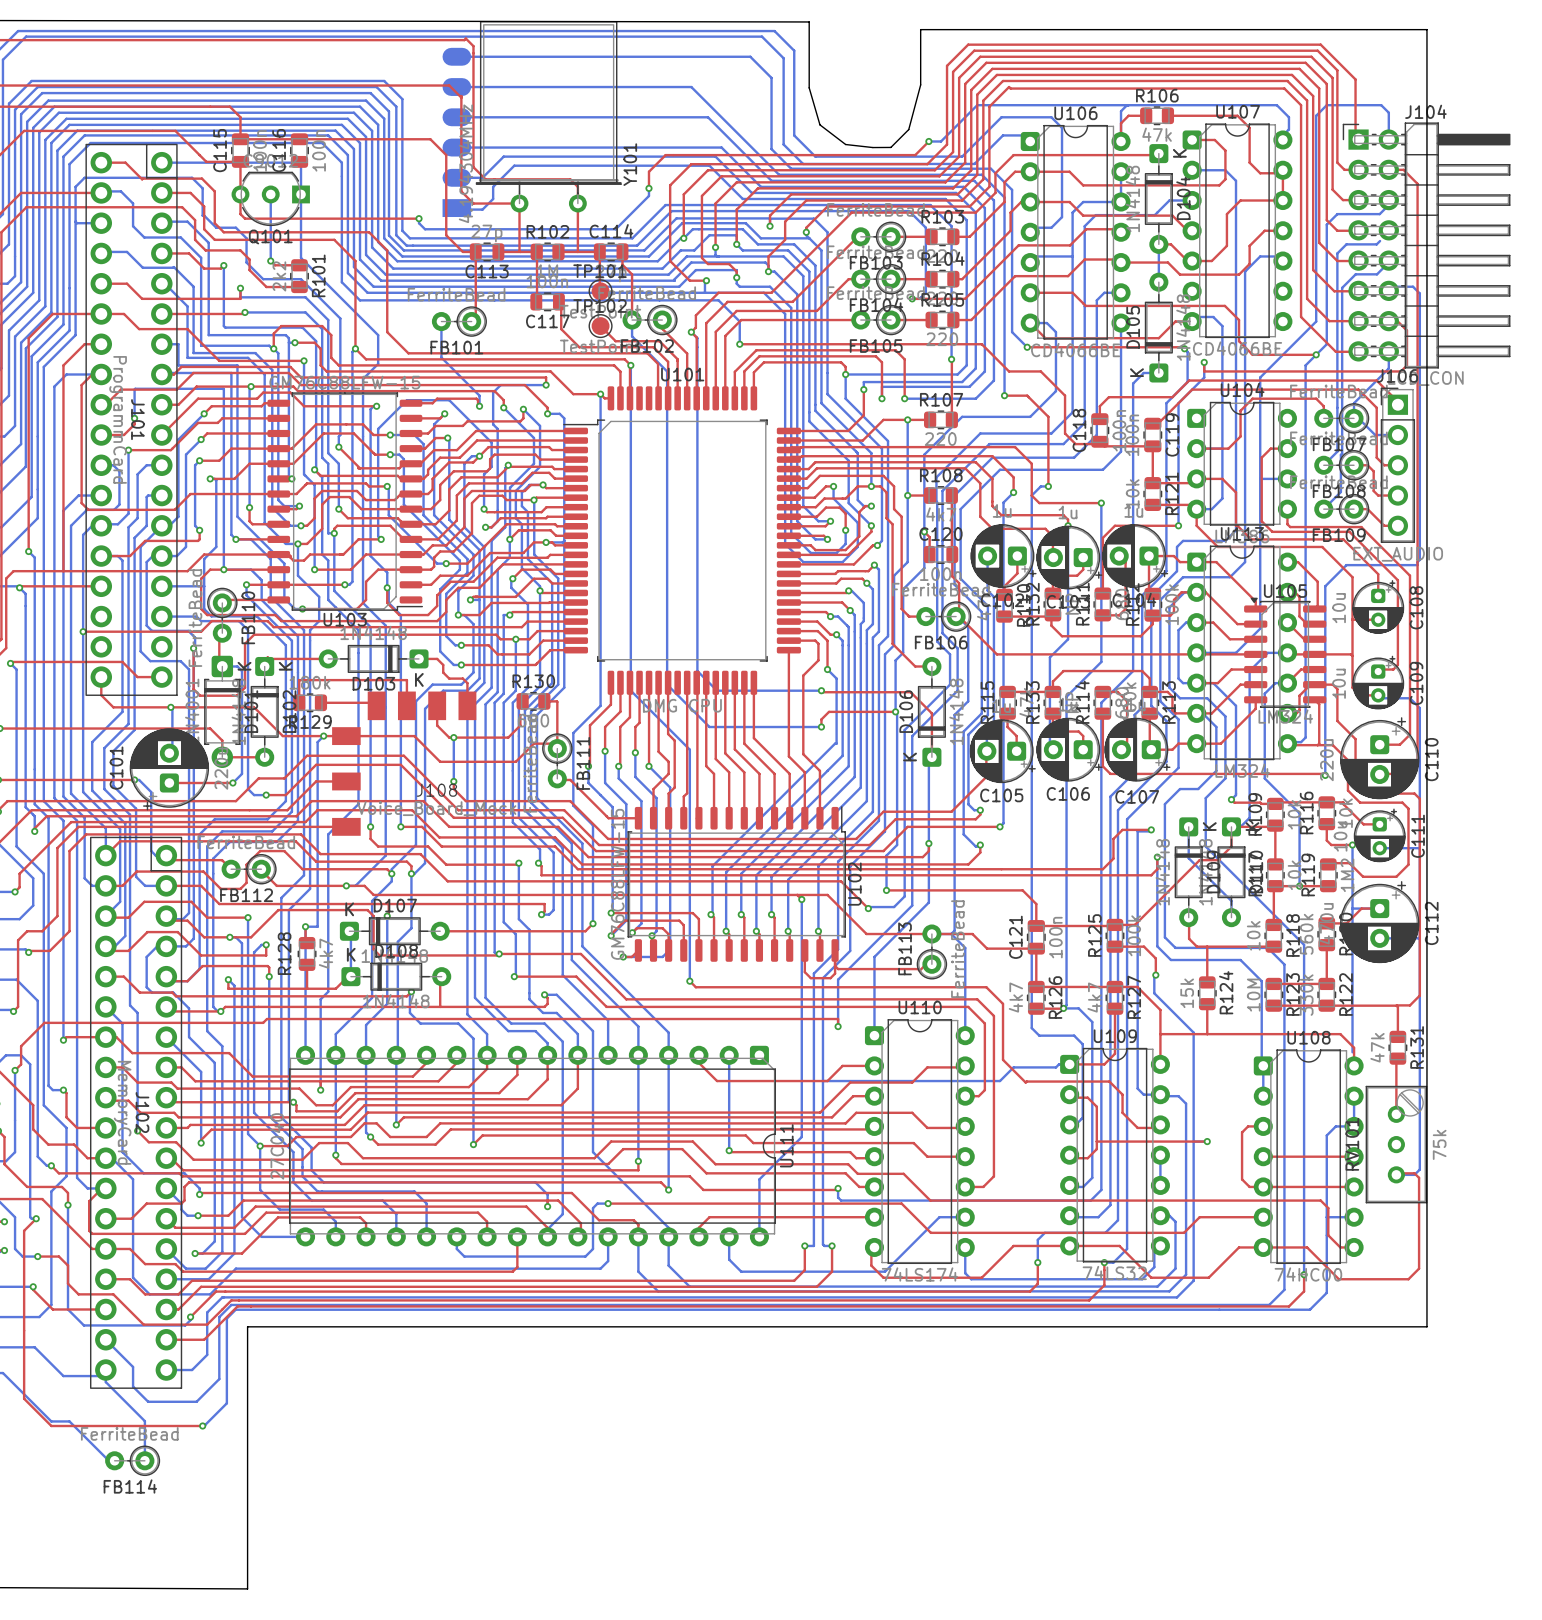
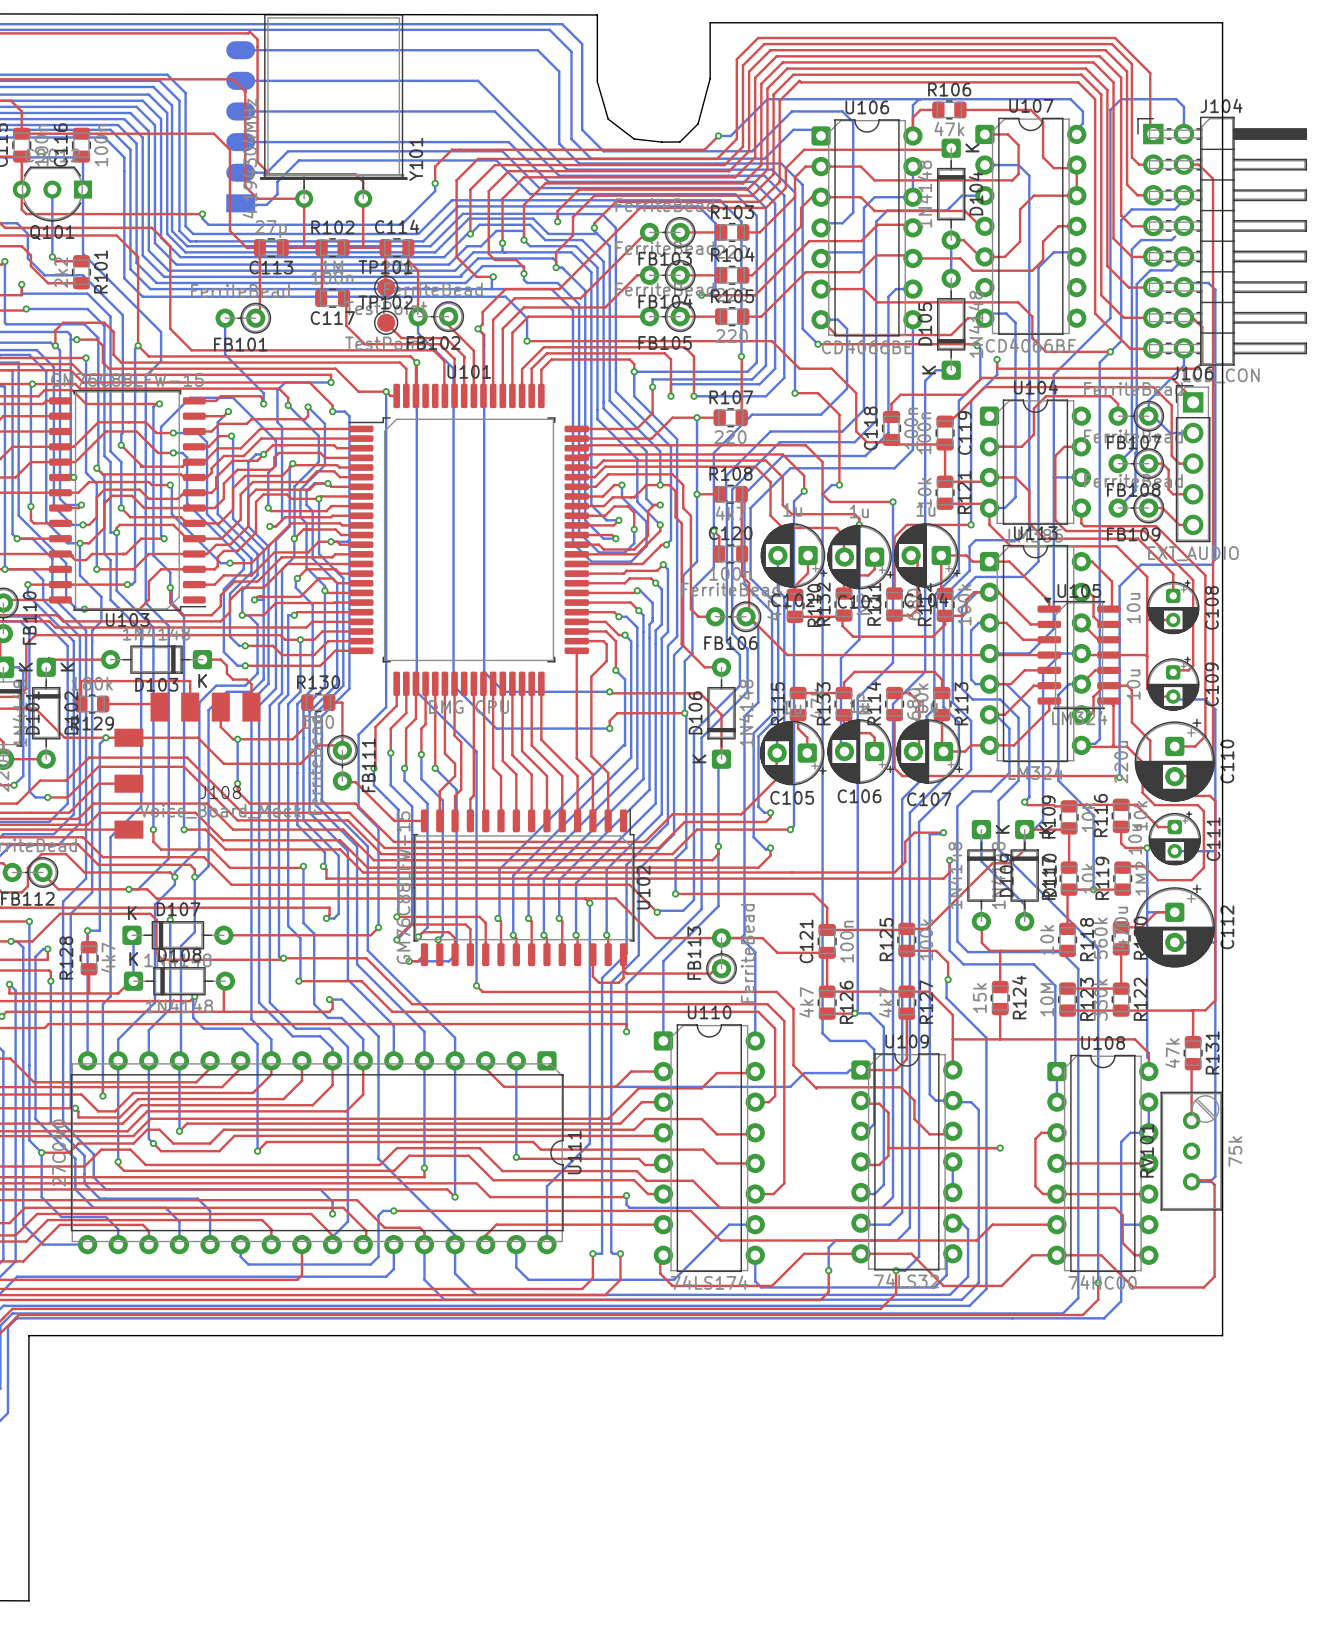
top track: (1149, 691) (1167, 691) (1172, 696) (1172, 710) (1175, 713) (1196, 713) -> none

